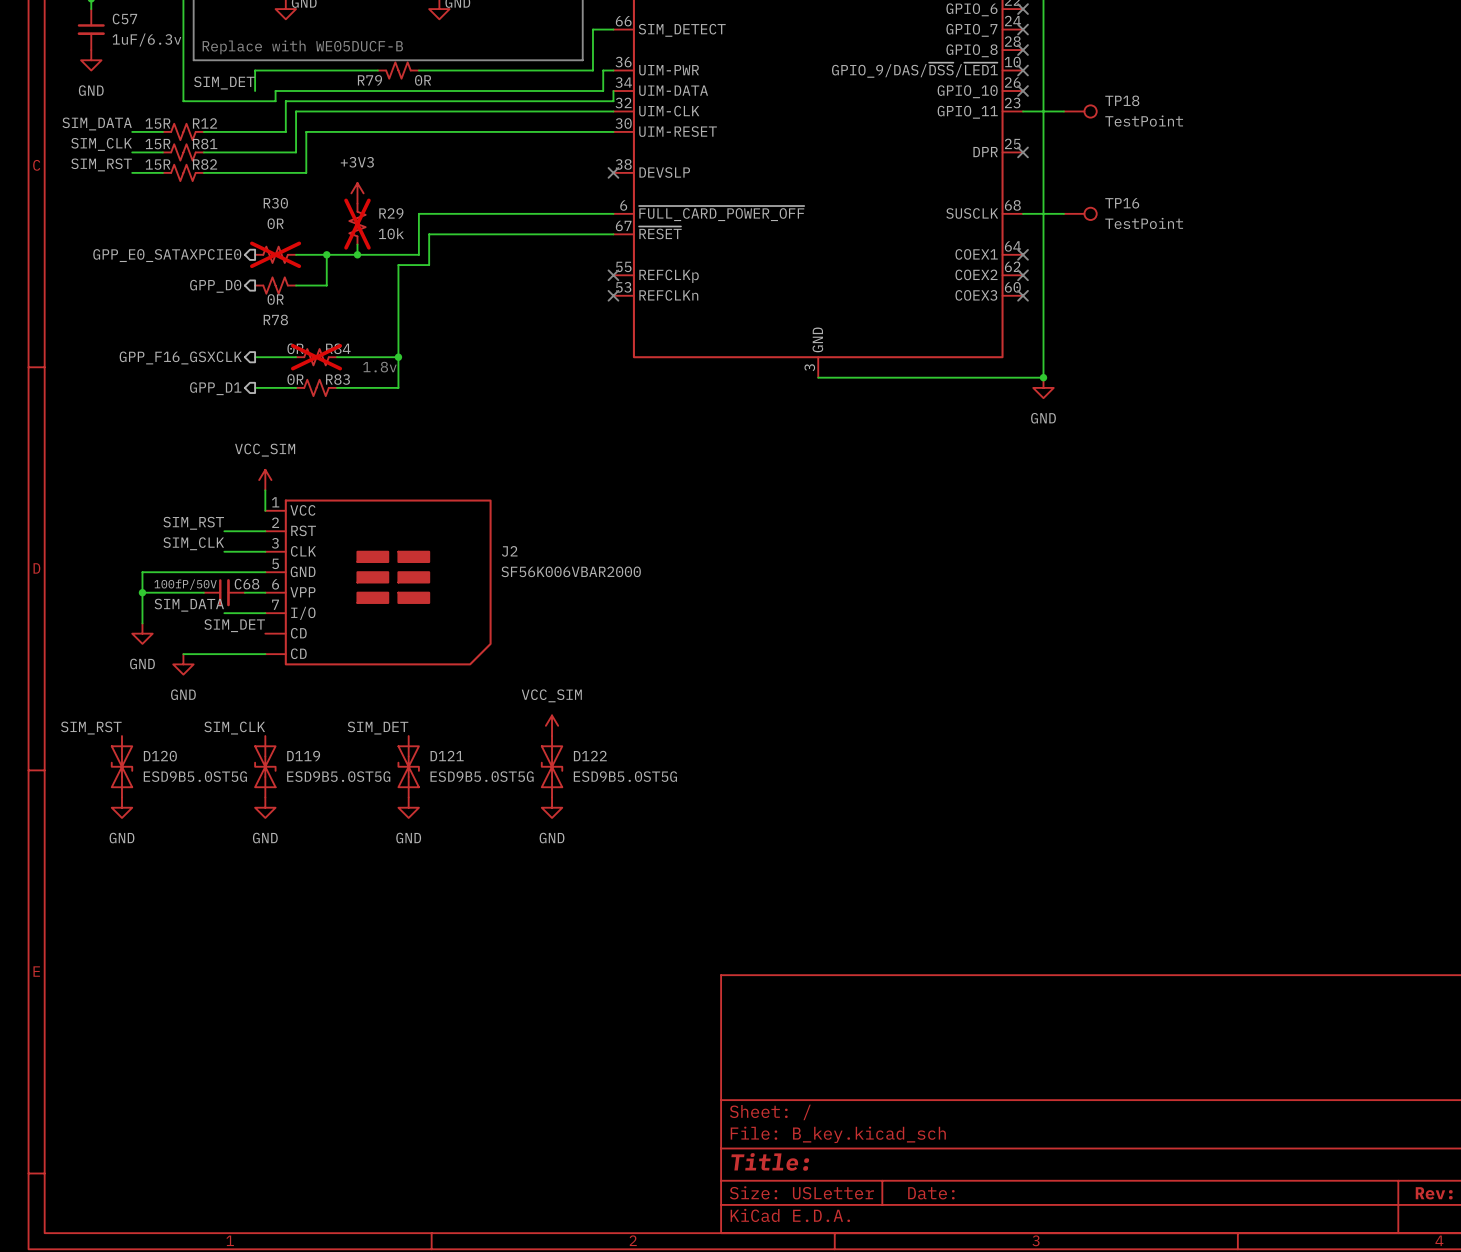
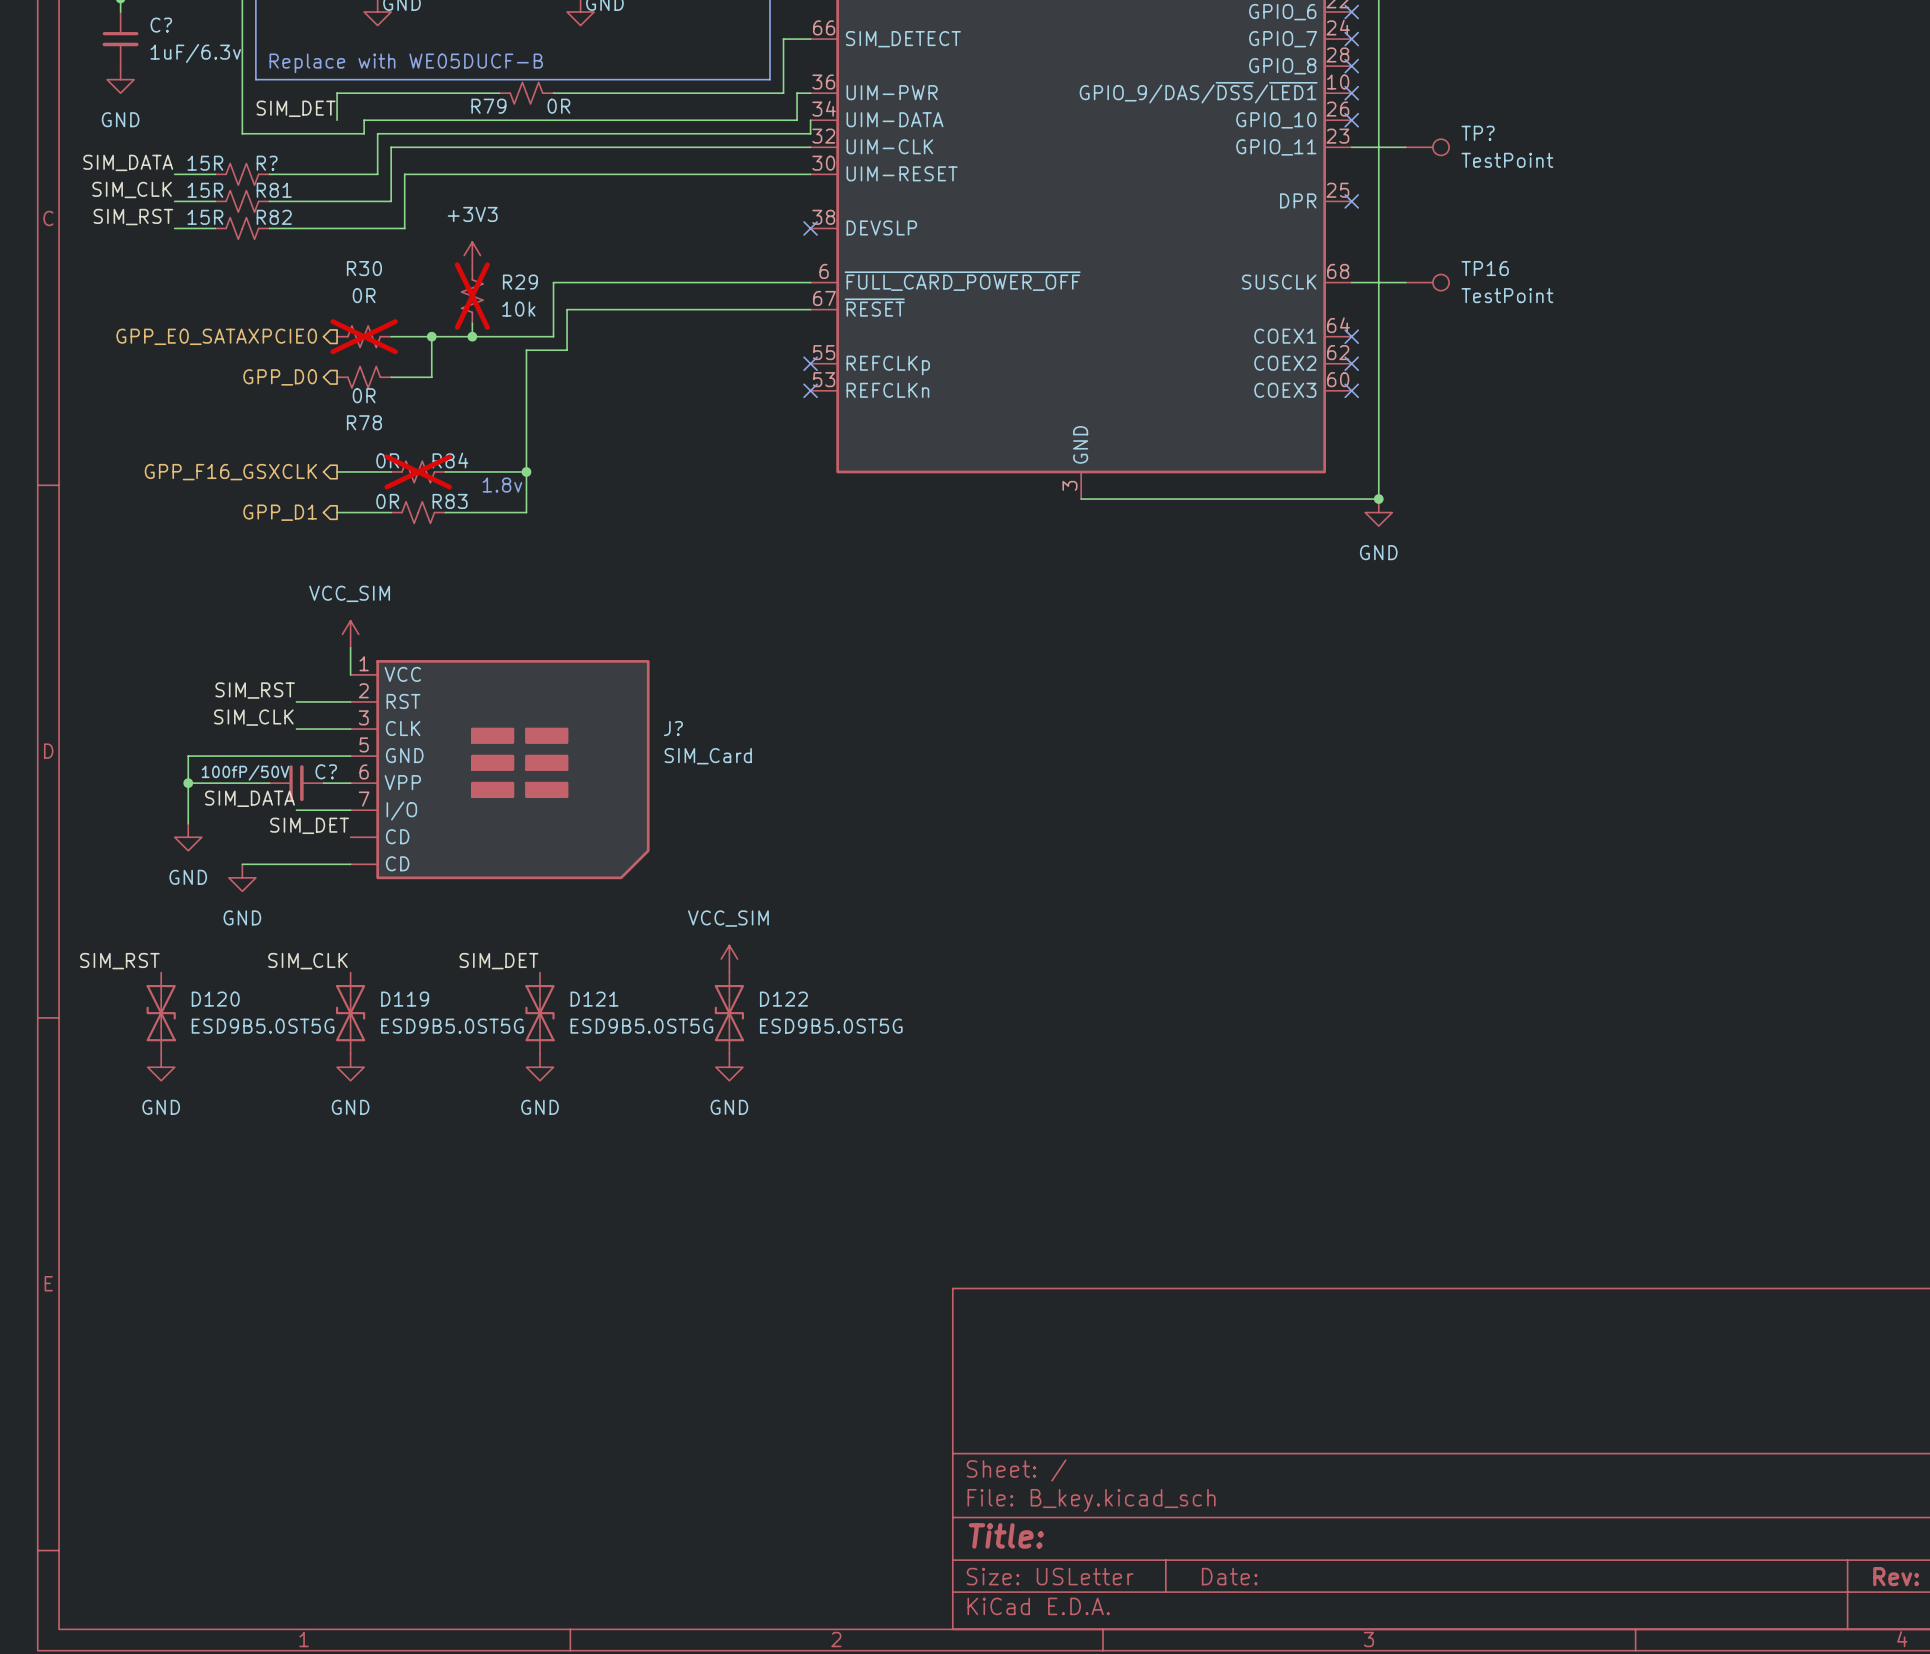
C57 name: C57 (124, 18) -> C? (161, 25)
TP18 name: TP18 (1122, 100) -> TP? (1478, 133)
R12 name: R12 (205, 123) -> R? (267, 163)
J2 name: J2 (509, 551) -> J? (673, 728)
J2 value: SF56K006VBAR2000 (571, 571) -> SIM_Card (708, 756)
C68 name: C68 (247, 584) -> C? (326, 771)

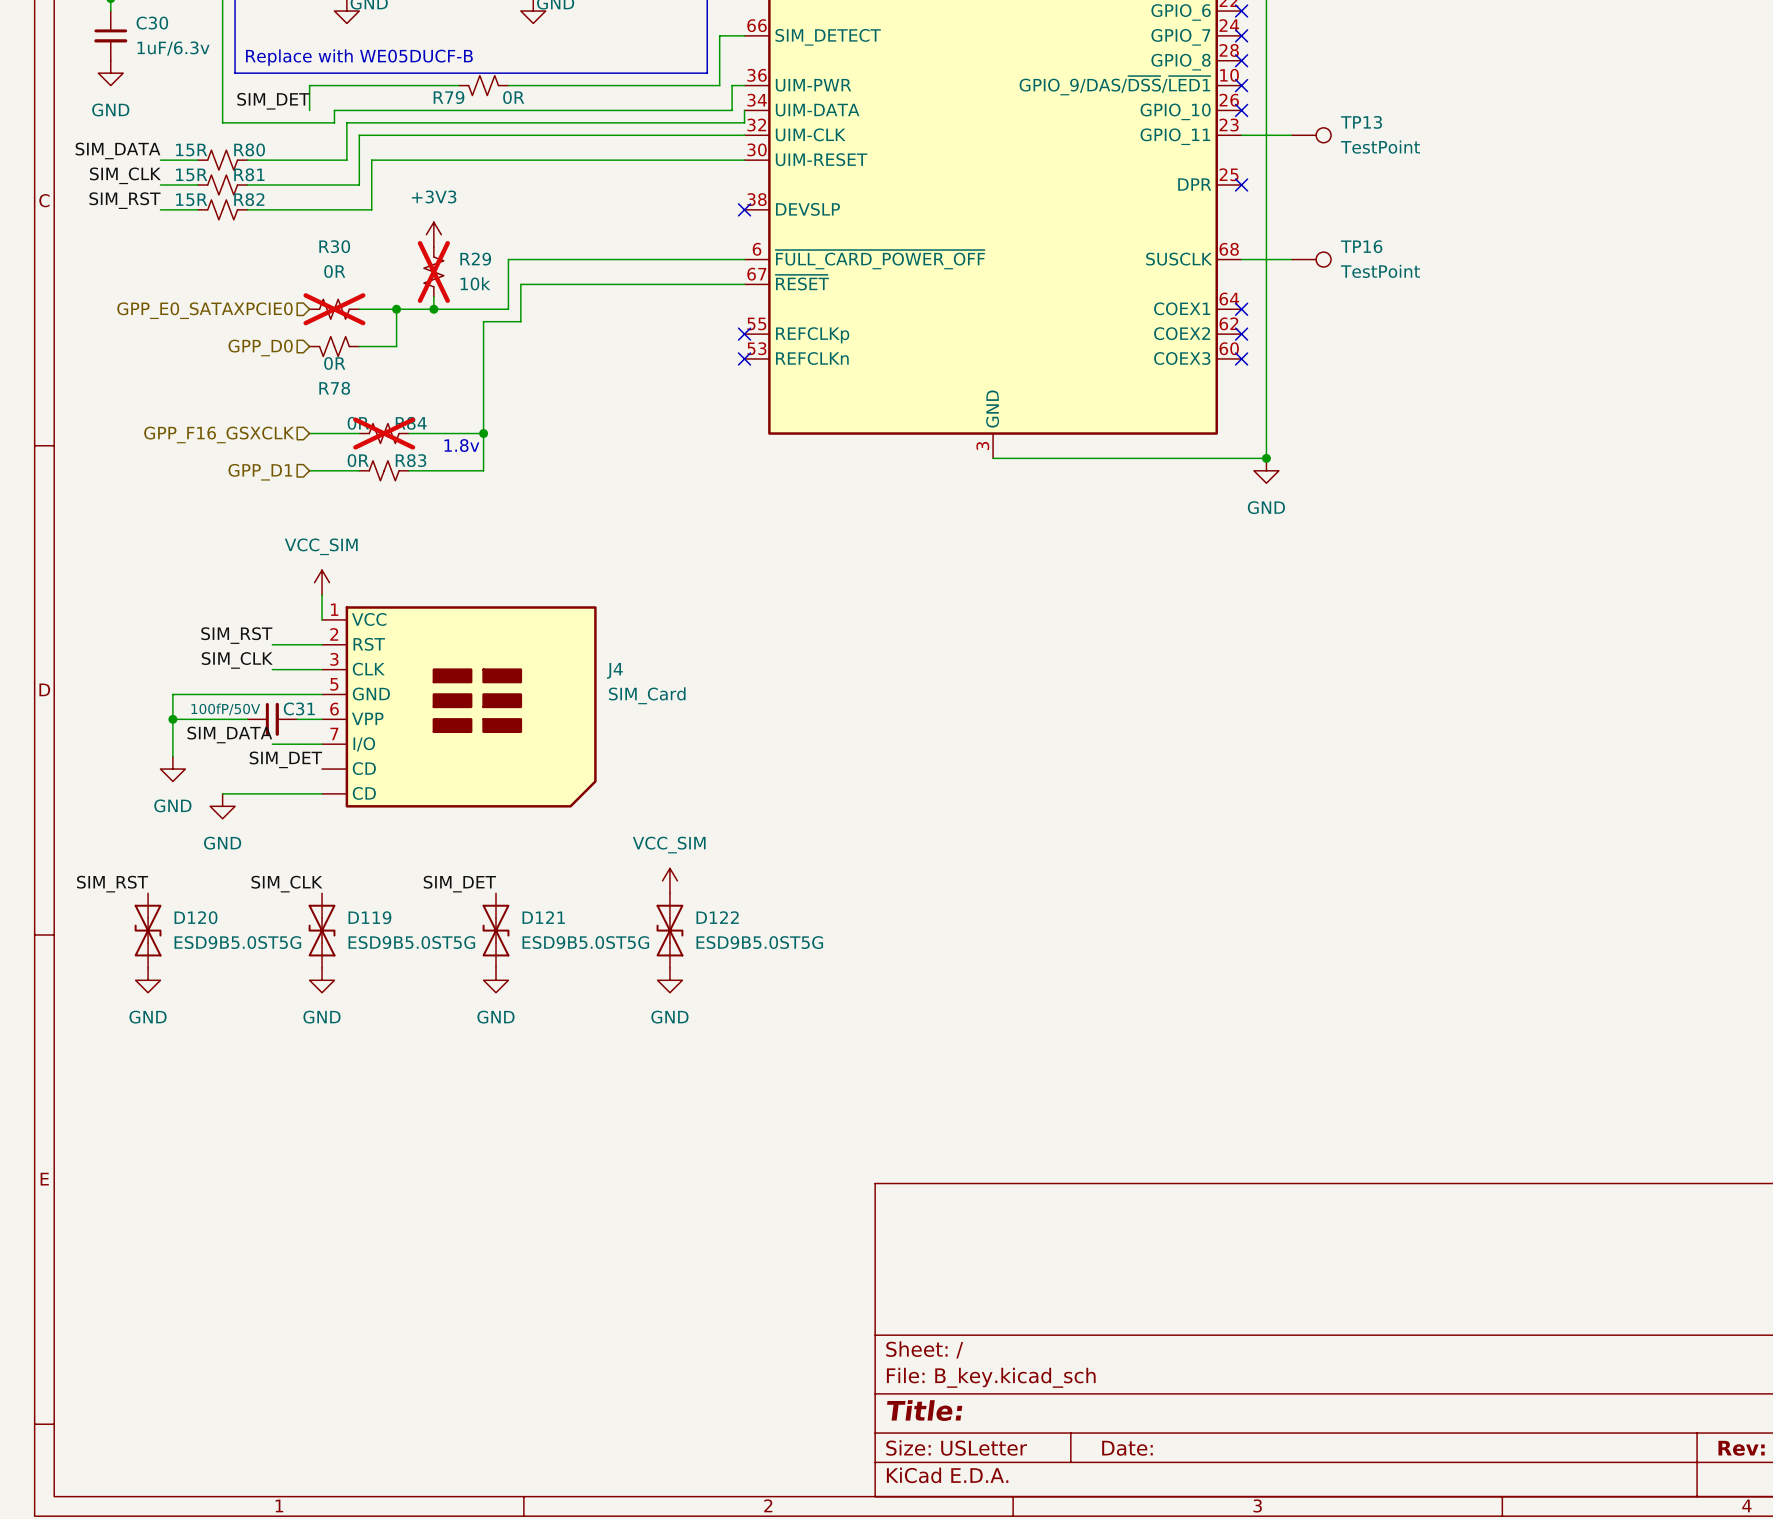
C? name: C? (161, 25) -> C30 (152, 23)
TP? name: TP? (1478, 133) -> TP13 (1361, 122)
R? name: R? (267, 163) -> R80 (249, 149)
hierarchical label shape: output (216, 336) -> input (204, 310)
hierarchical label shape: output (280, 377) -> input (260, 347)
hierarchical label shape: output (230, 472) -> input (219, 434)
hierarchical label shape: output (280, 512) -> input (260, 472)
J? name: J? (673, 728) -> J4 (614, 670)
C? name: C? (326, 771) -> C31 (299, 708)

